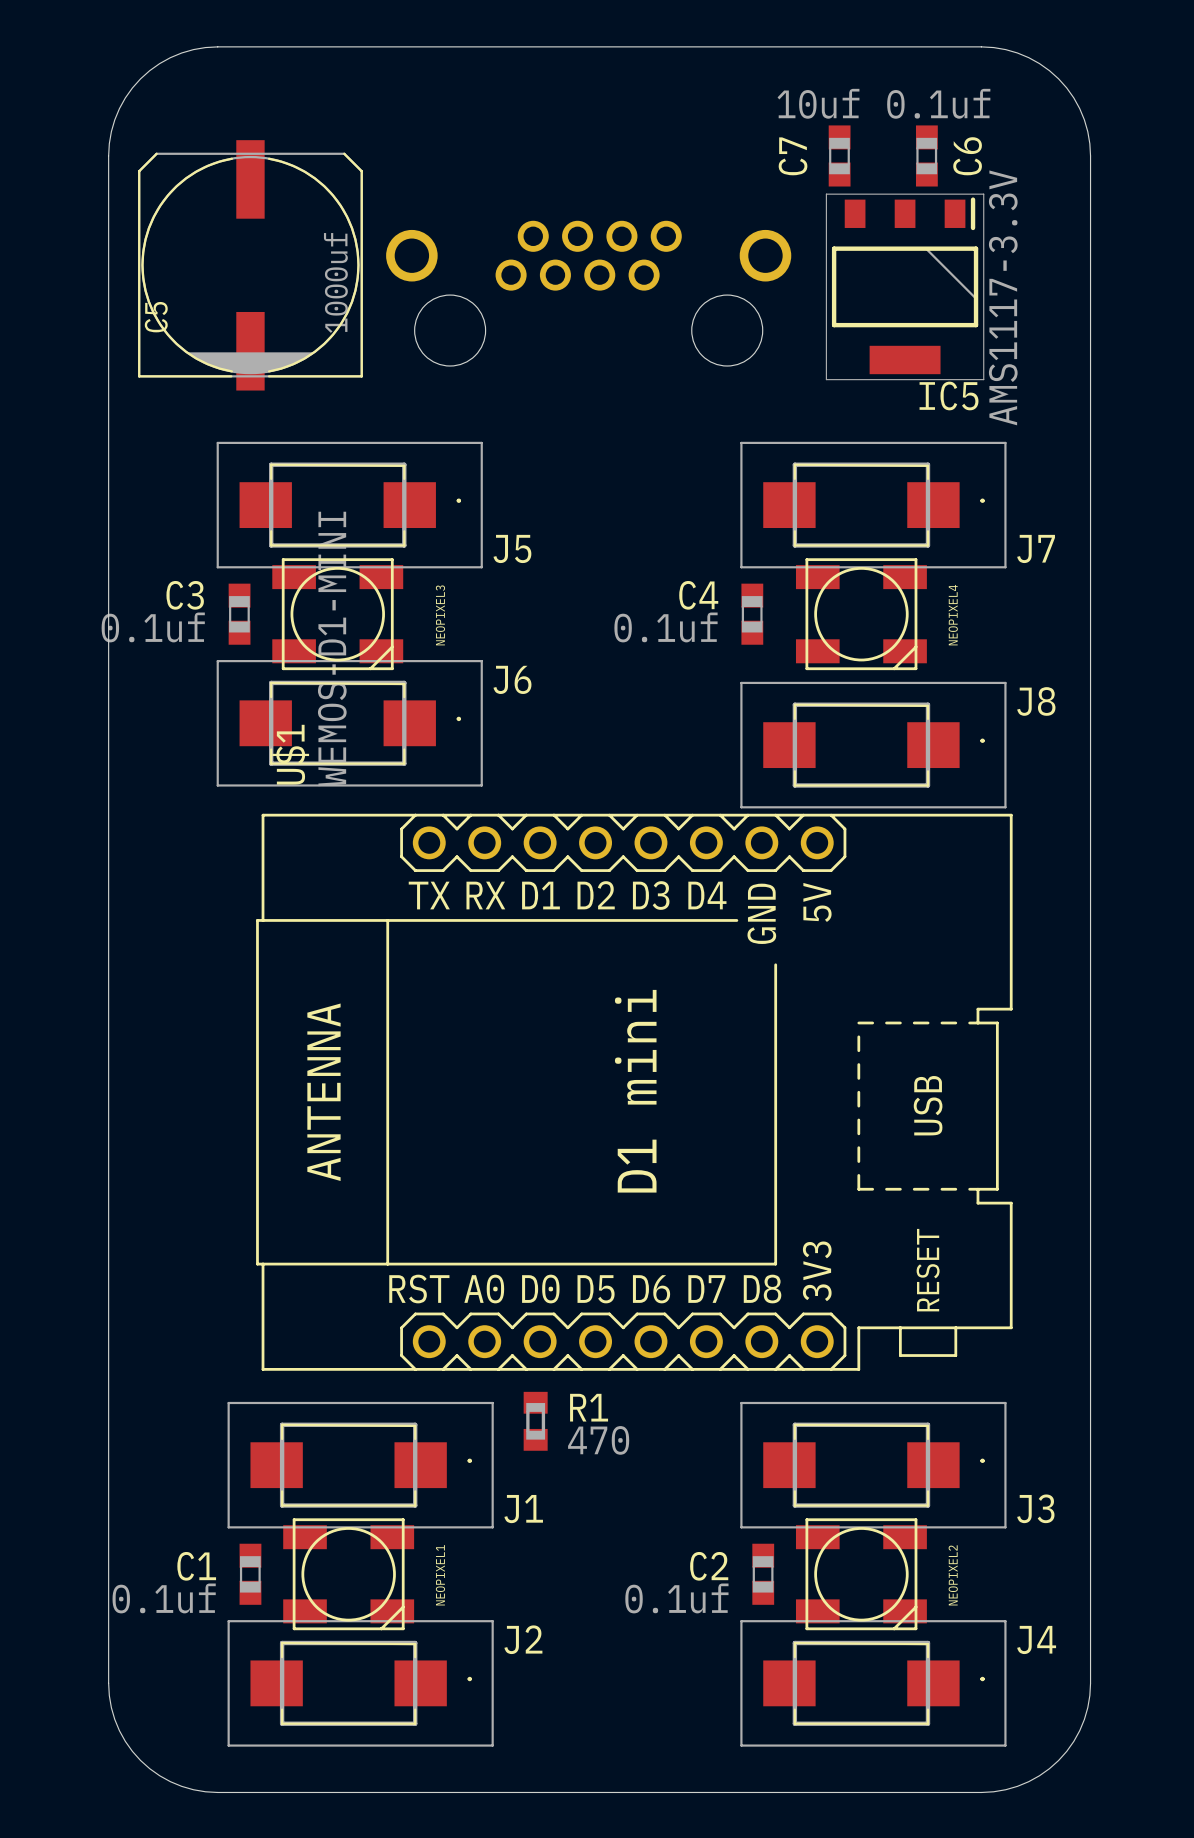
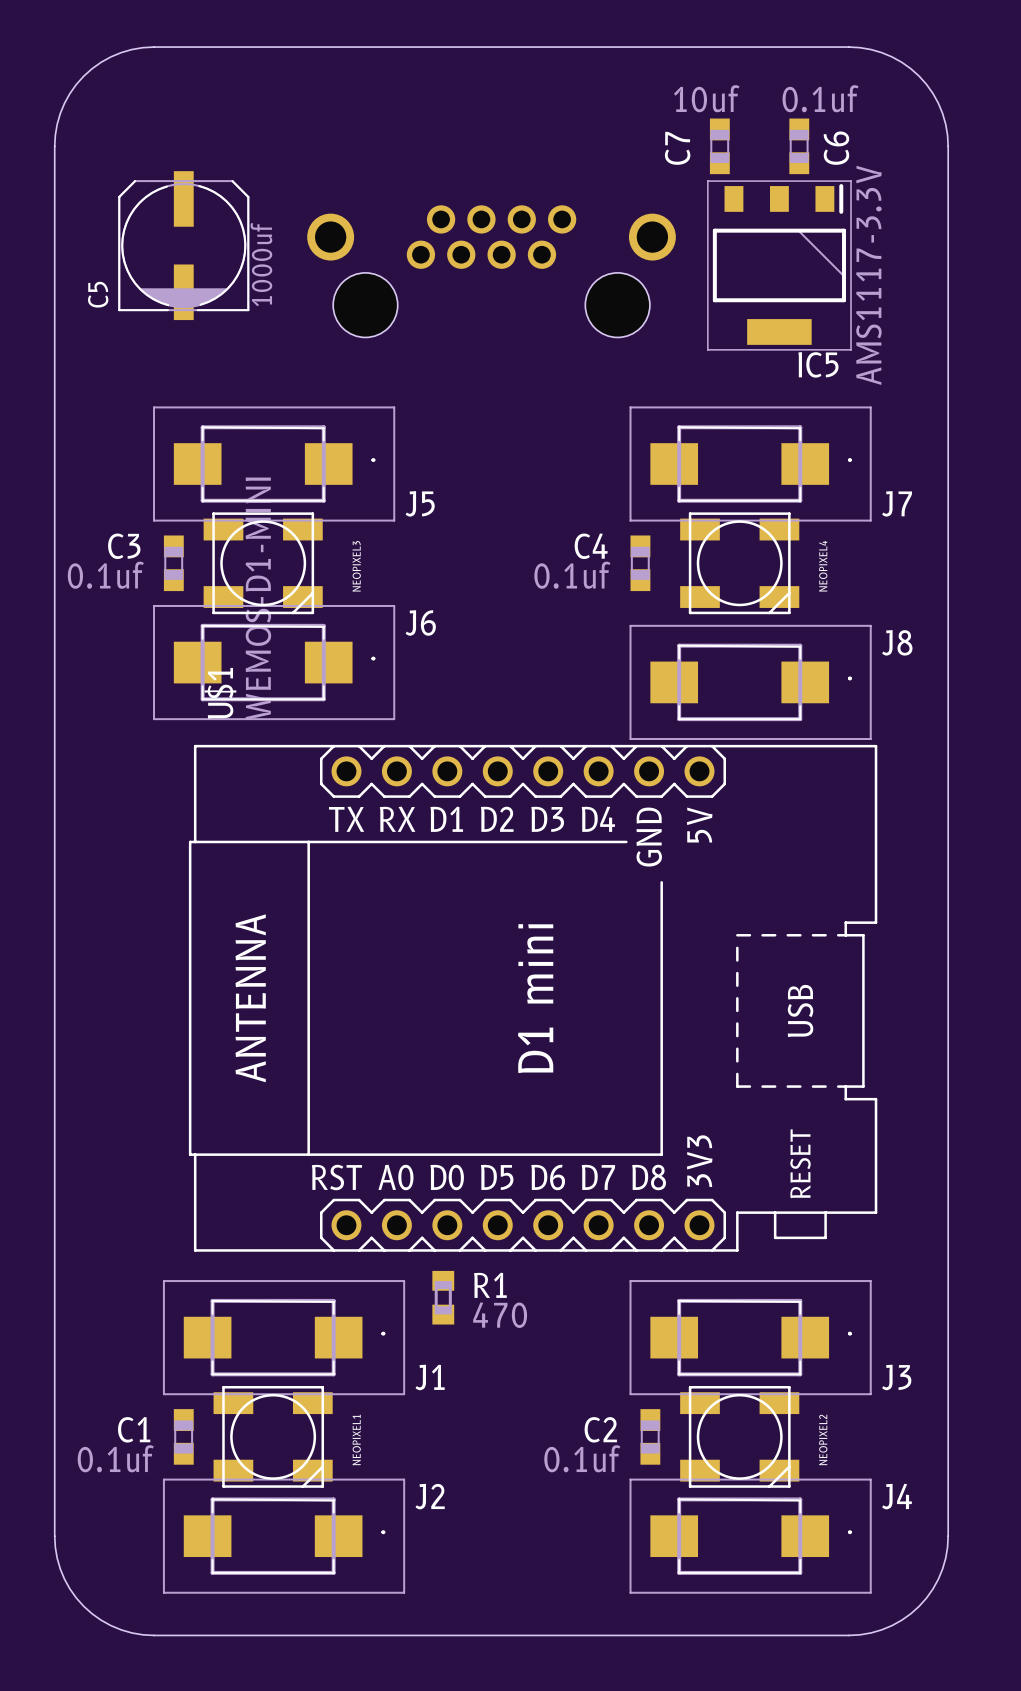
C5 footprint: [138, 140, 363, 391] -> [118, 171, 250, 321]

